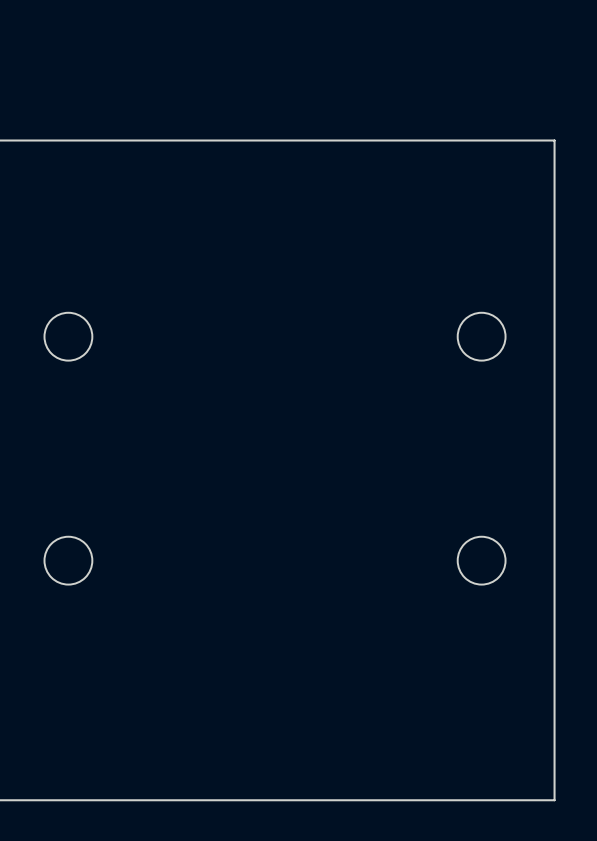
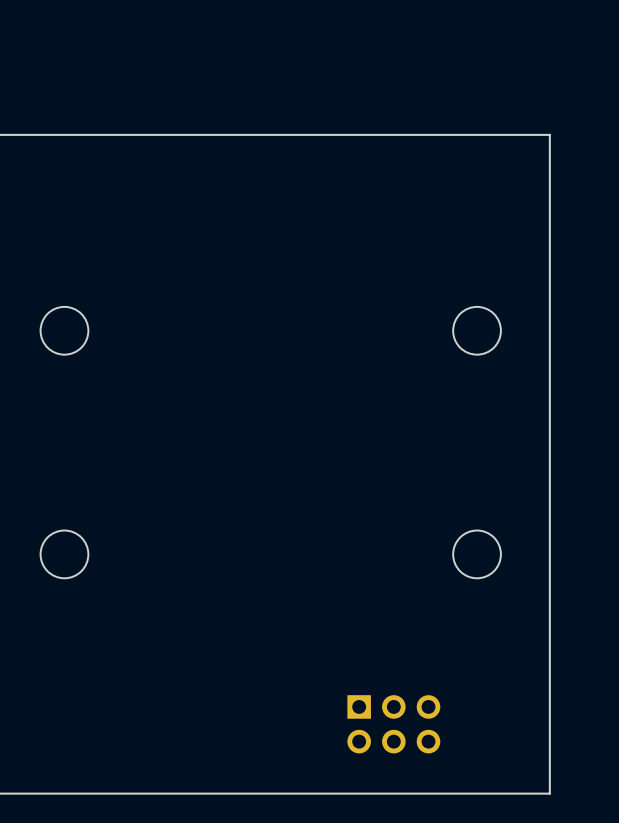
part: none -> (393, 724)

